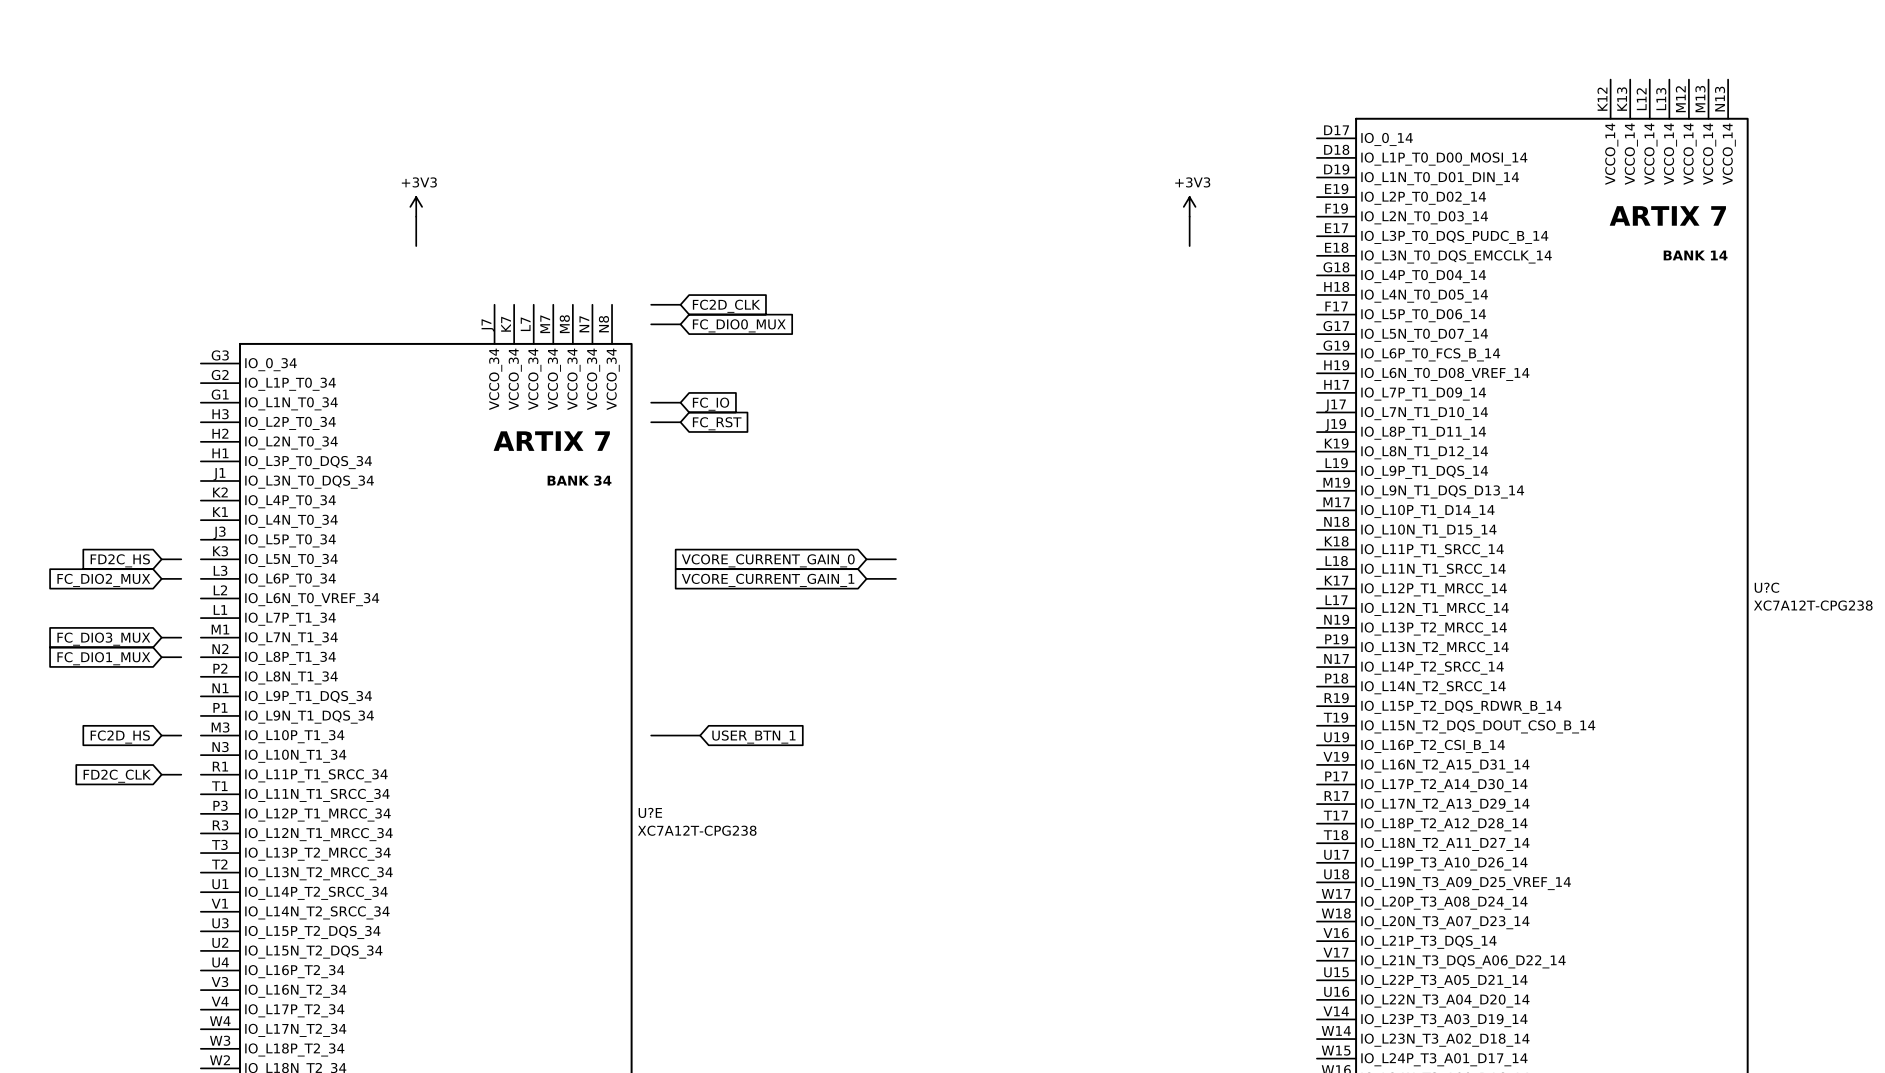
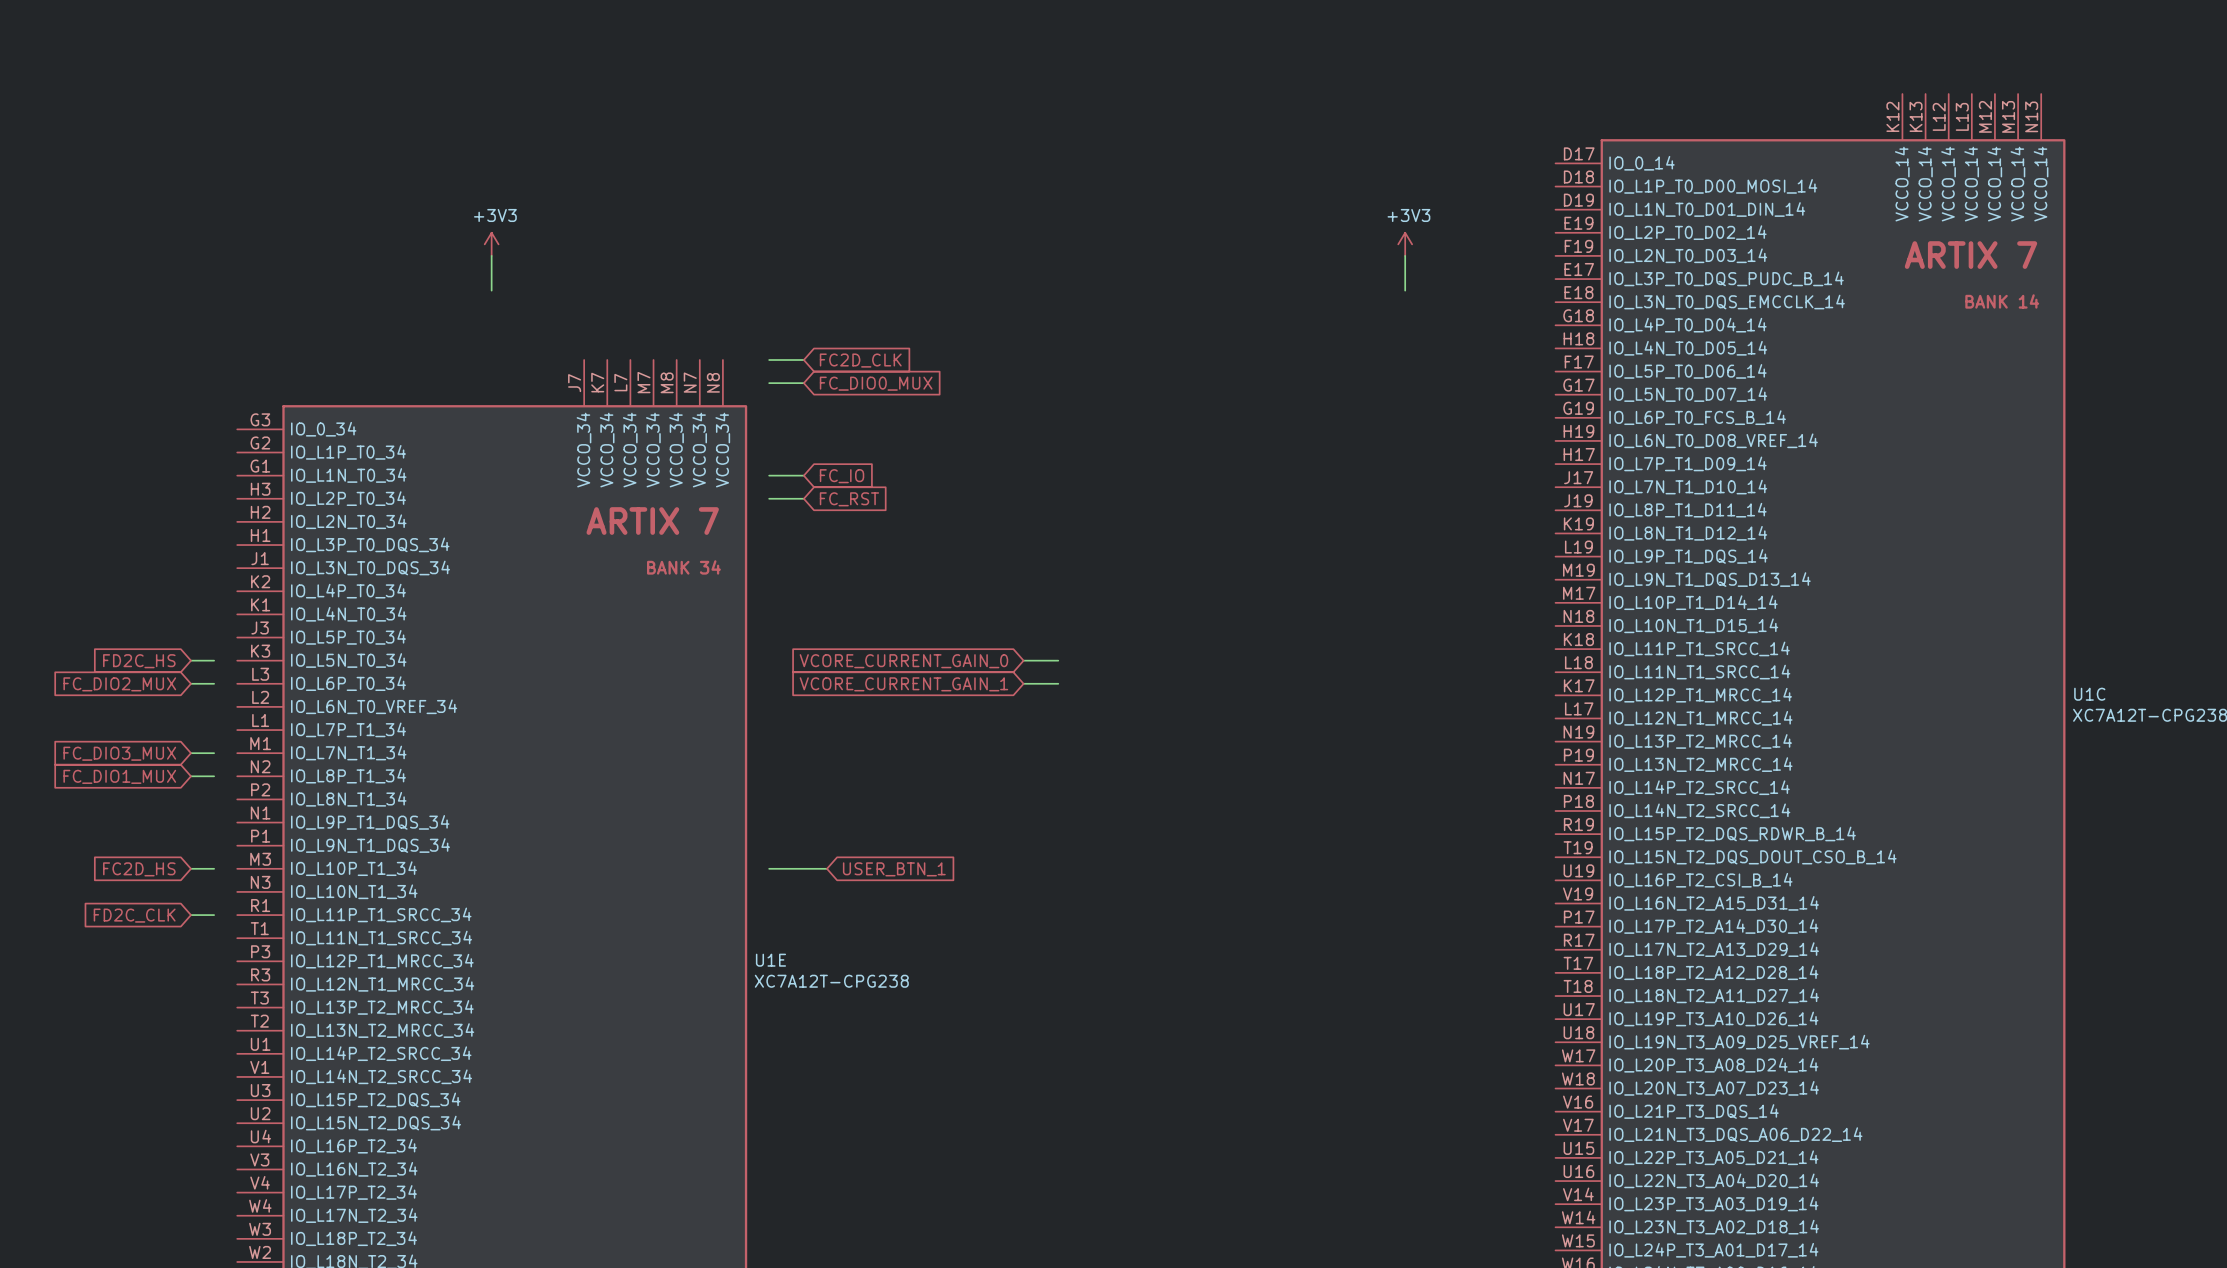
U?C name: U?C (1766, 587) -> U1C (2089, 694)
U?E name: U?E (650, 812) -> U1E (770, 960)

